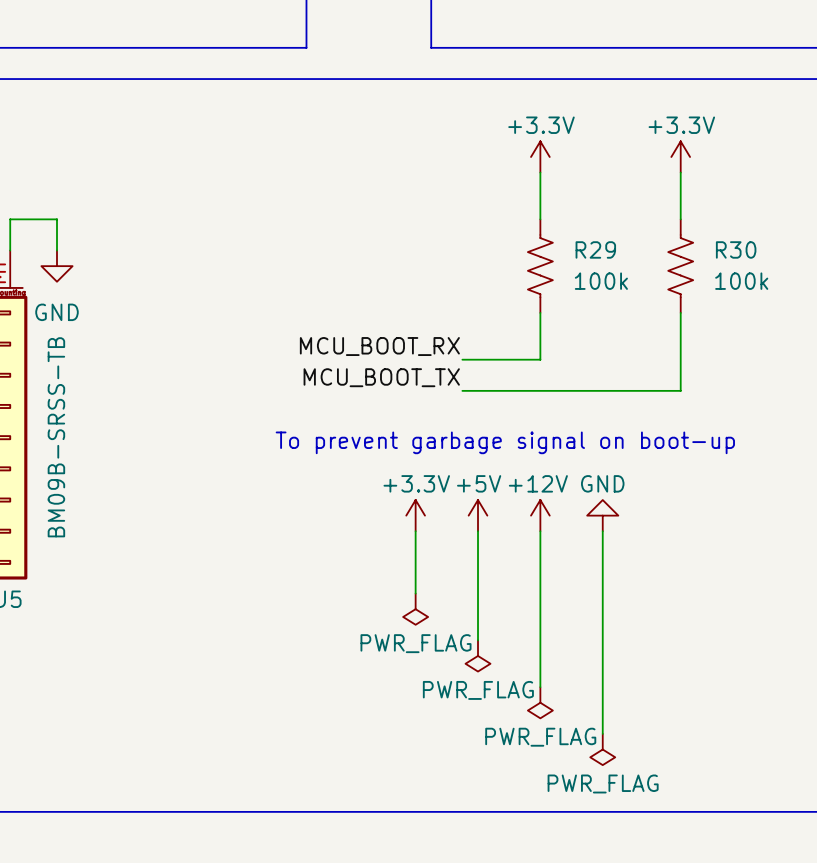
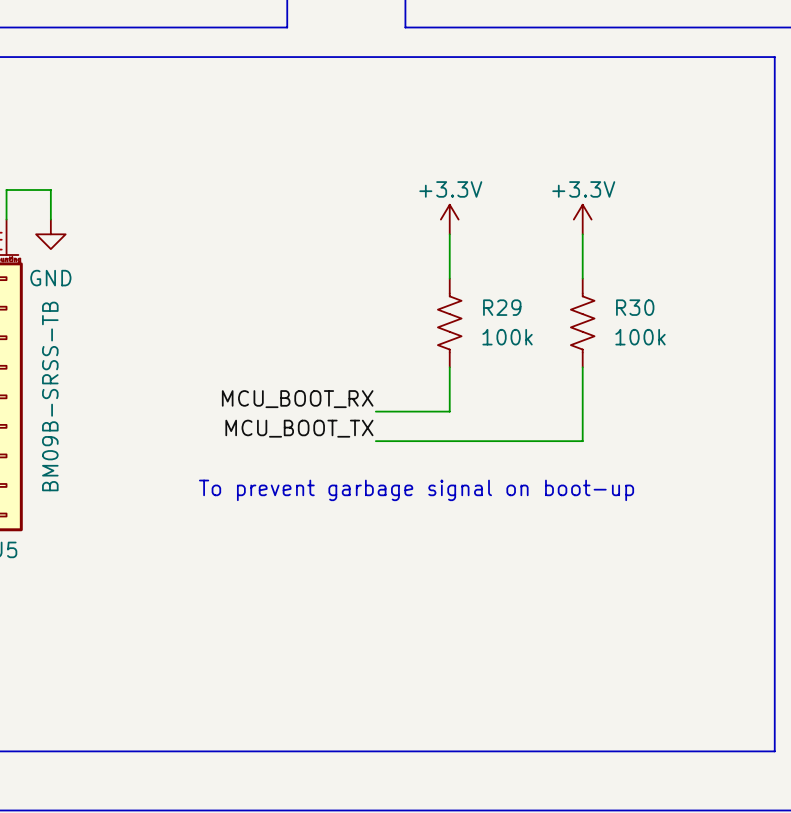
power symbol: +3.3V (540, 156) -> none
power symbol: +3.3V (680, 156) -> none
wire: (540, 172) (540, 219) -> (449, 234) (449, 278)
wire: (680, 172) (680, 219) -> (582, 234) (582, 278)
power symbol: none -> +3.3V (449, 219)
power symbol: none -> +3.3V (582, 219)
R29 position: (540, 266) -> (449, 322)
R30 position: (680, 266) -> (582, 322)
wire: (540, 312) (540, 359) (462, 359) -> (449, 367) (449, 411) (375, 411)
wire: (680, 312) (680, 390) (462, 390) -> (582, 367) (582, 441) (375, 441)
label position: MCU_BOOT_RX (379, 346) -> MCU_BOOT_RX (297, 399)
label position: MCU_BOOT_TX (381, 377) -> MCU_BOOT_TX (299, 428)
text position: To prevent garbage signal on boot-up (505, 442) -> To prevent garbage signal on boot-up (416, 490)
power symbol: +3.3V (415, 515) -> none
power symbol: +5V (478, 515) -> none
power symbol: +12V (540, 515) -> none
power symbol: GND (602, 515) -> none
wire: (415, 531) (415, 593) -> none
wire: (478, 531) (478, 640) -> none
wire: (540, 531) (540, 687) -> none
wire: (602, 531) (602, 733) -> none
power symbol: PWR_FLAG (415, 609) -> none
power symbol: PWR_FLAG (478, 655) -> none
power symbol: PWR_FLAG (540, 702) -> none
power symbol: PWR_FLAG (602, 749) -> none

